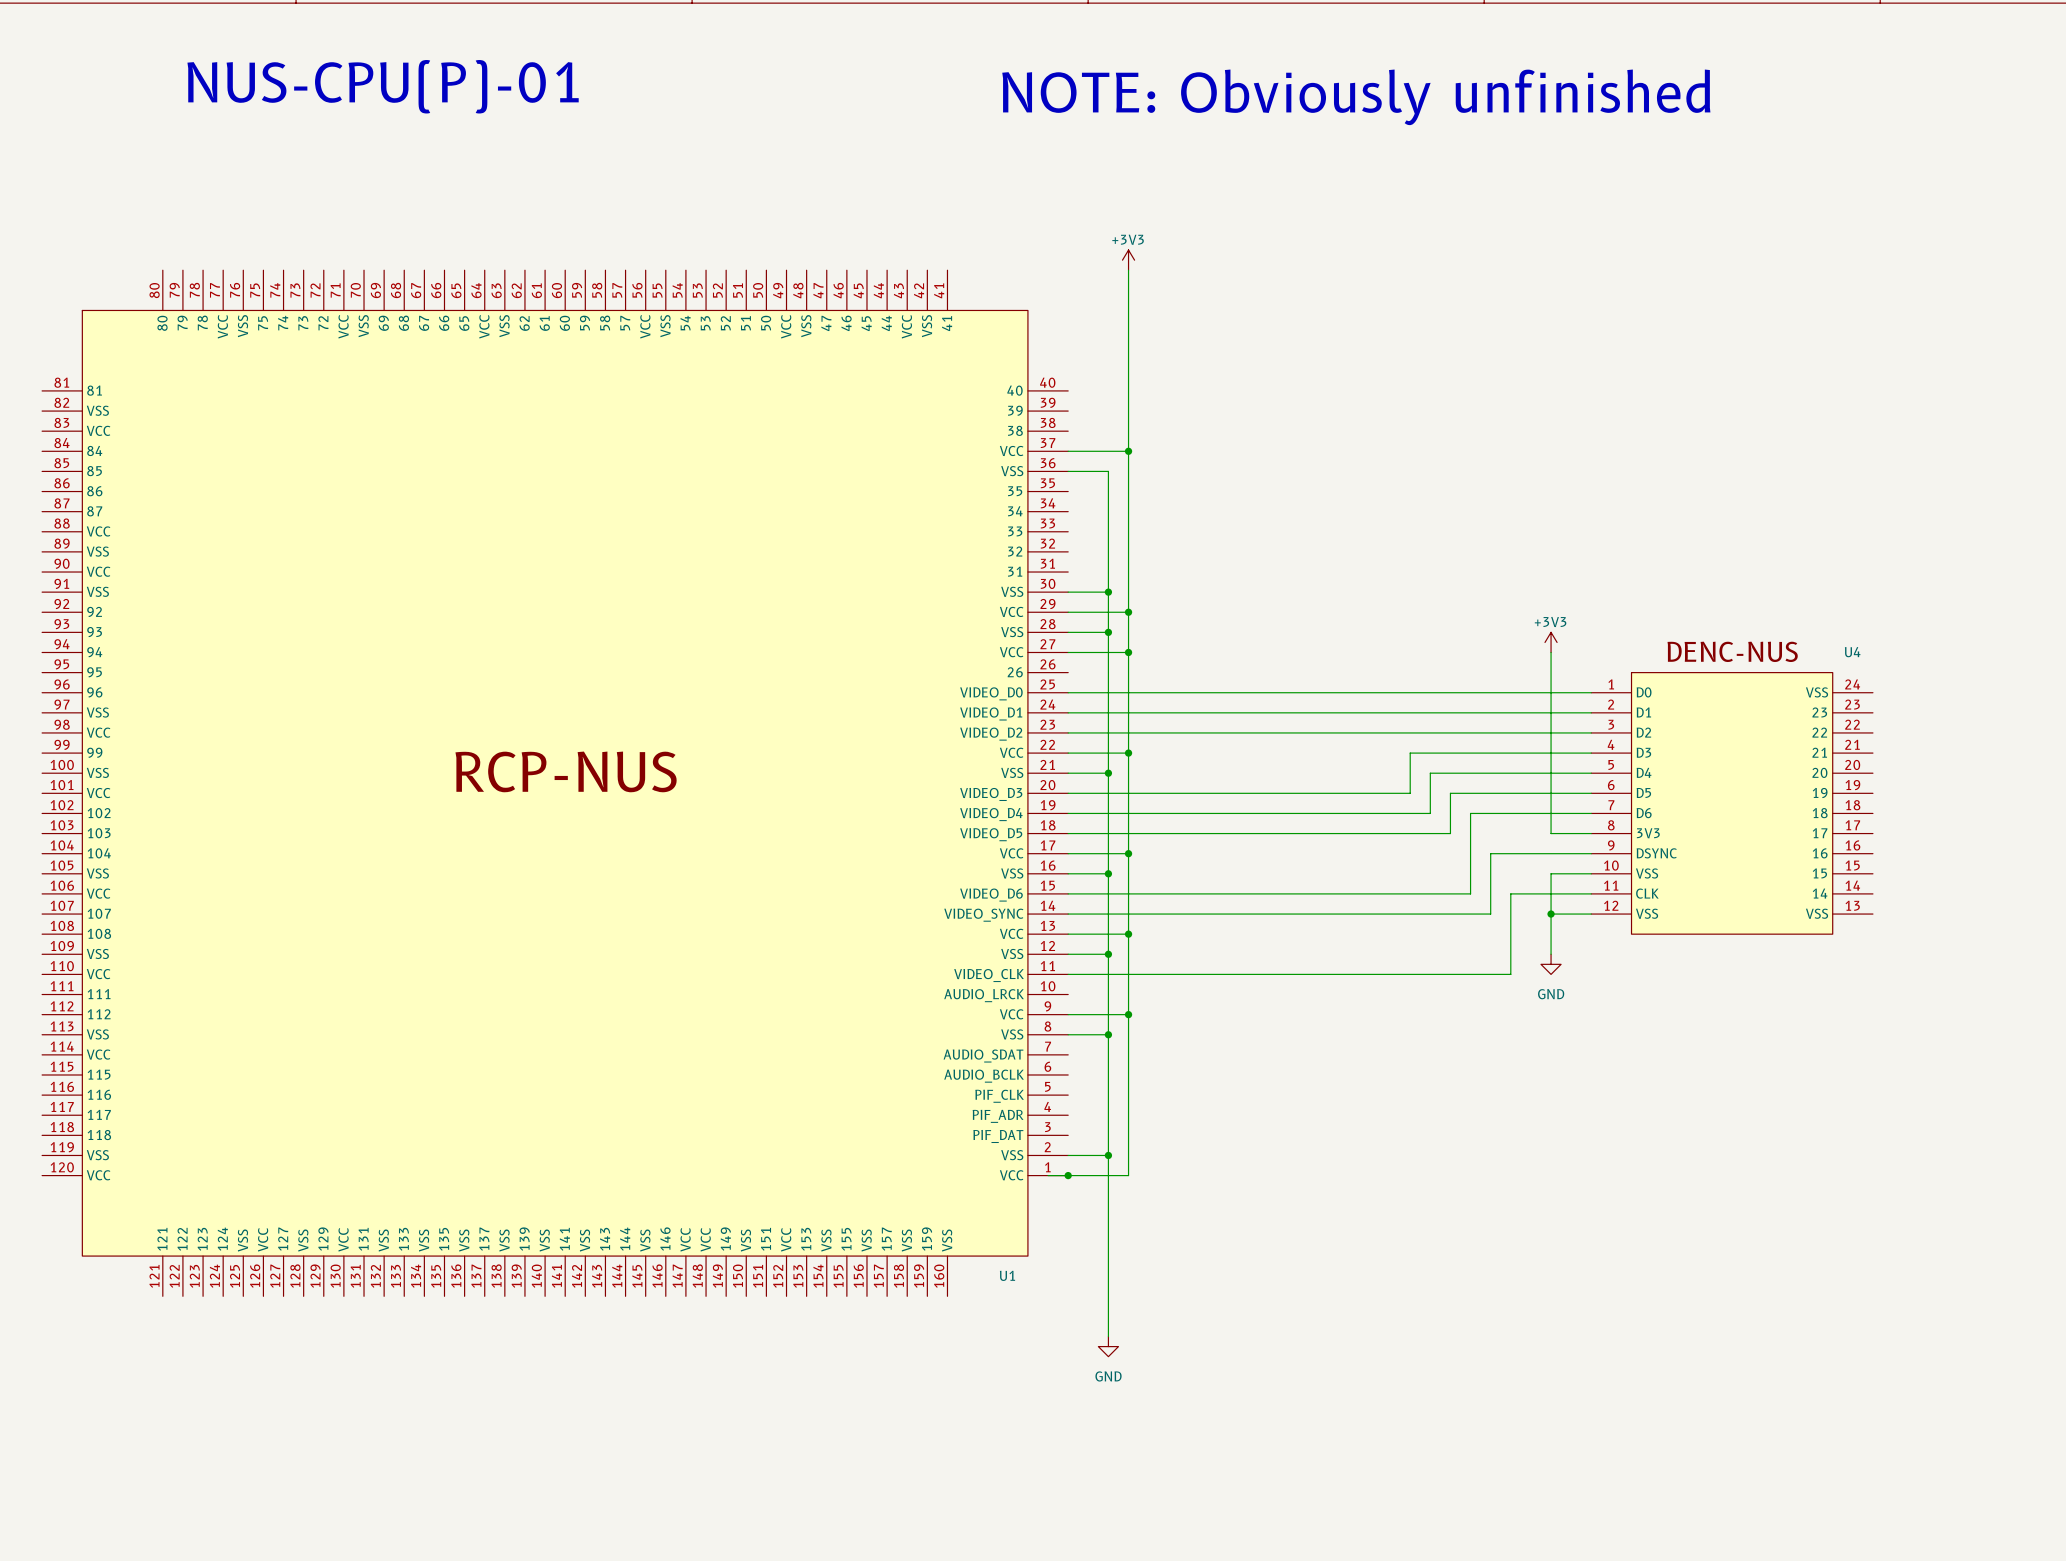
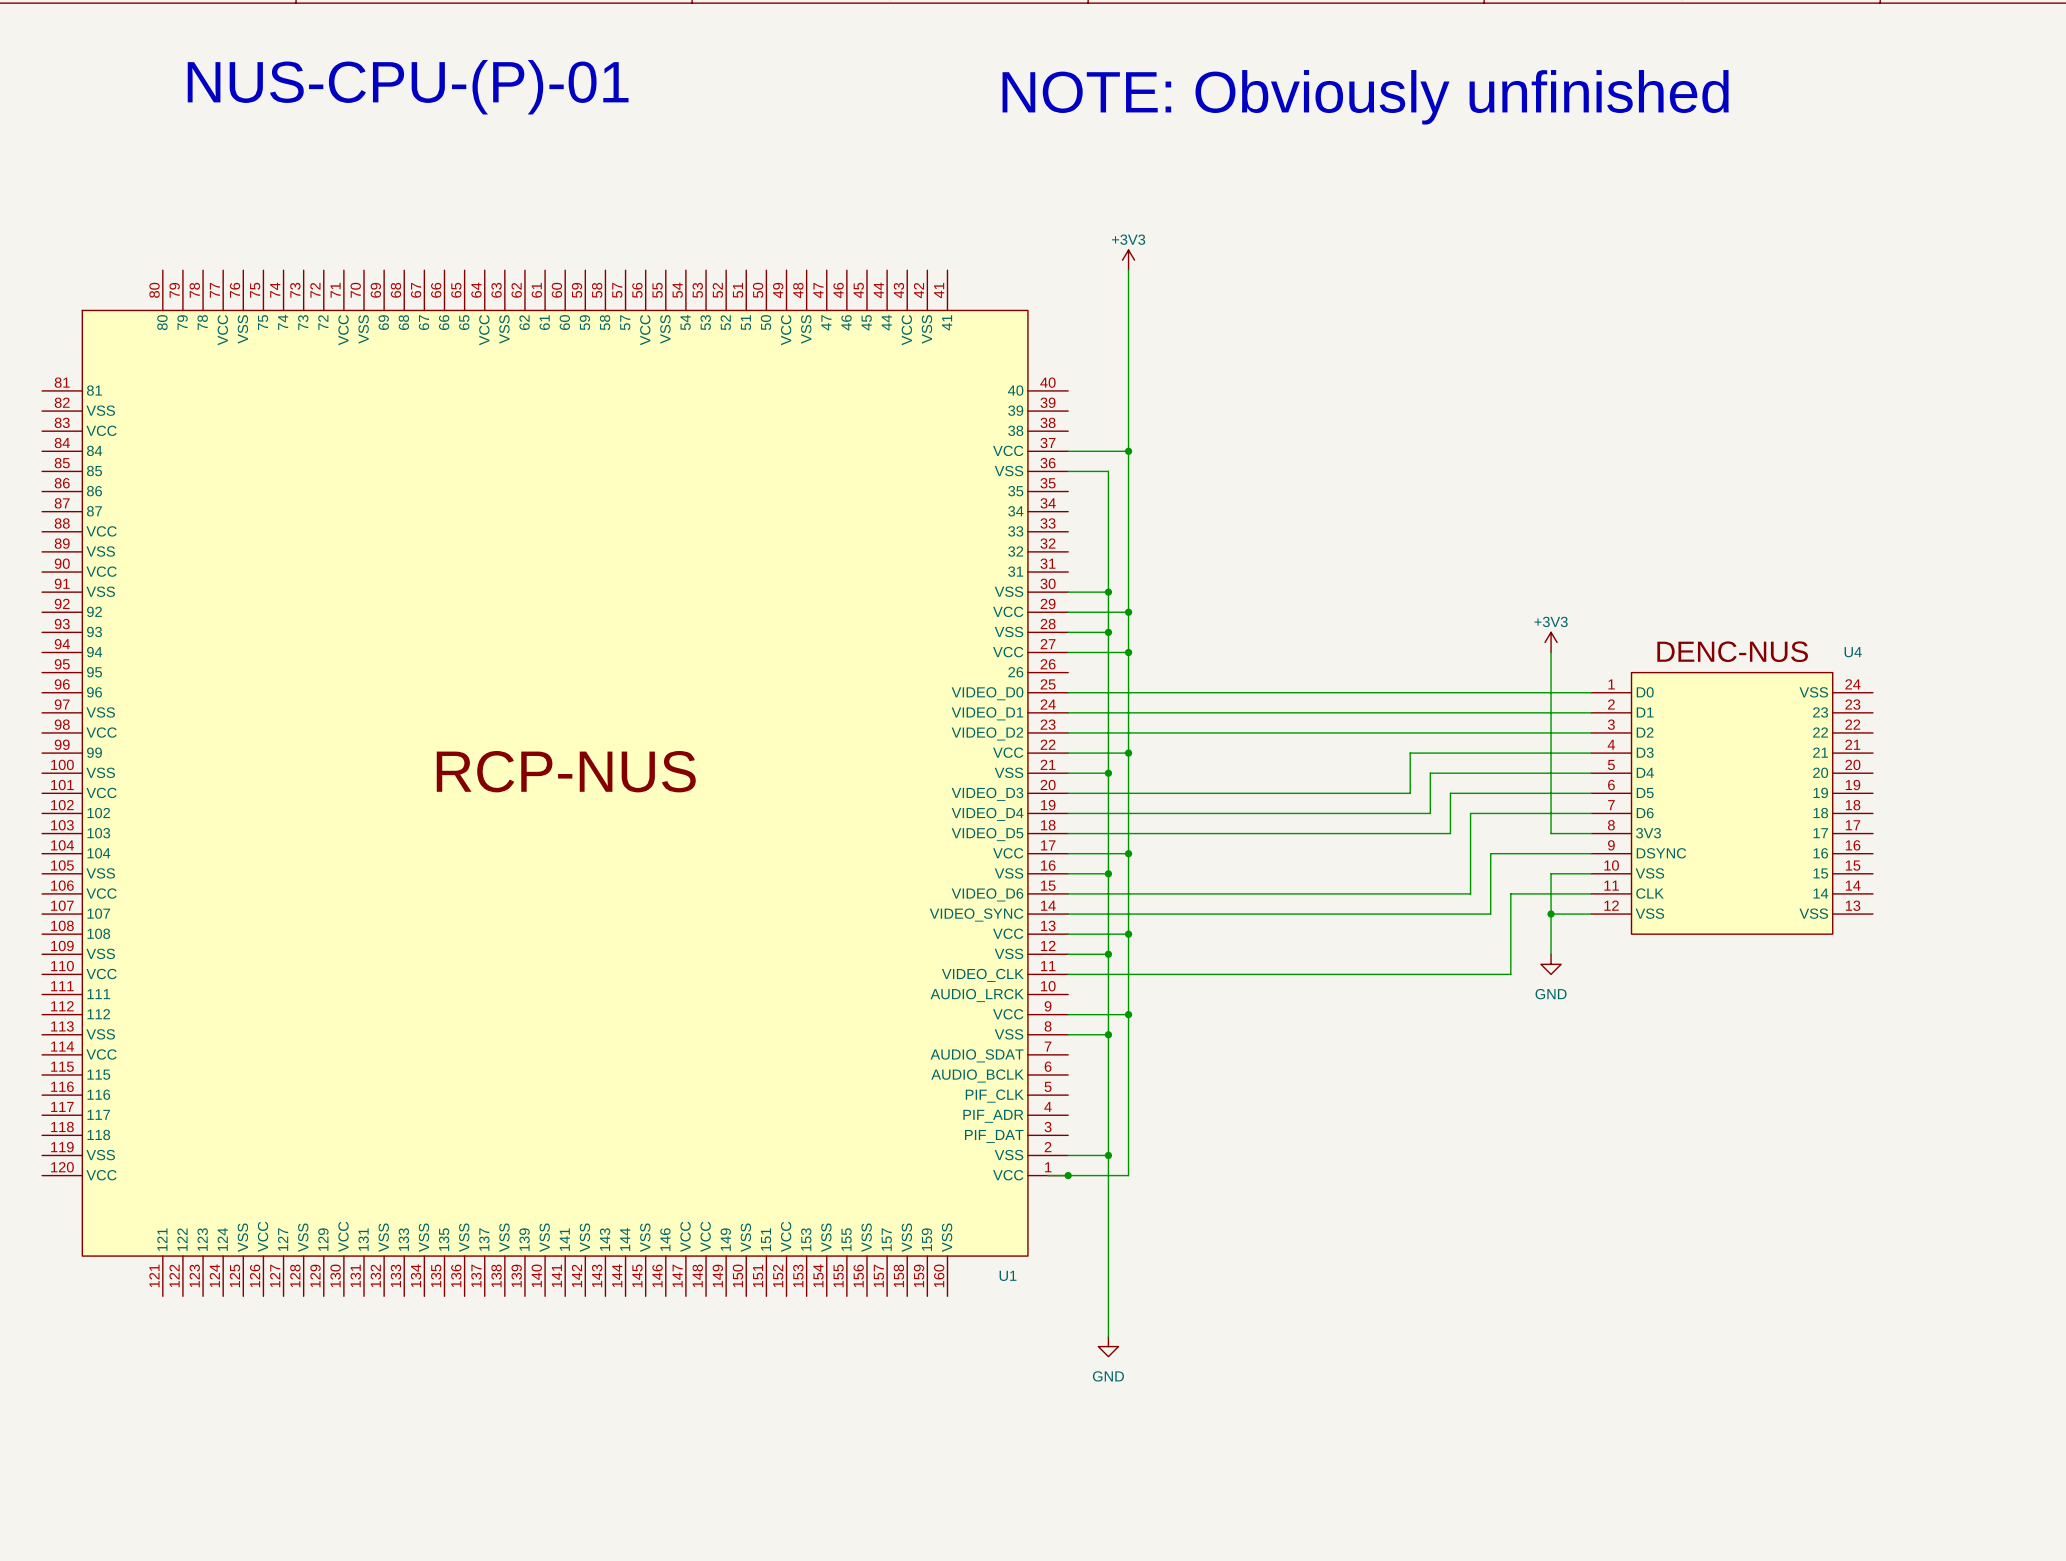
text: NUS-CPU(P)-01 (383, 86) -> NUS-CPU-(P)-01 (408, 87)

